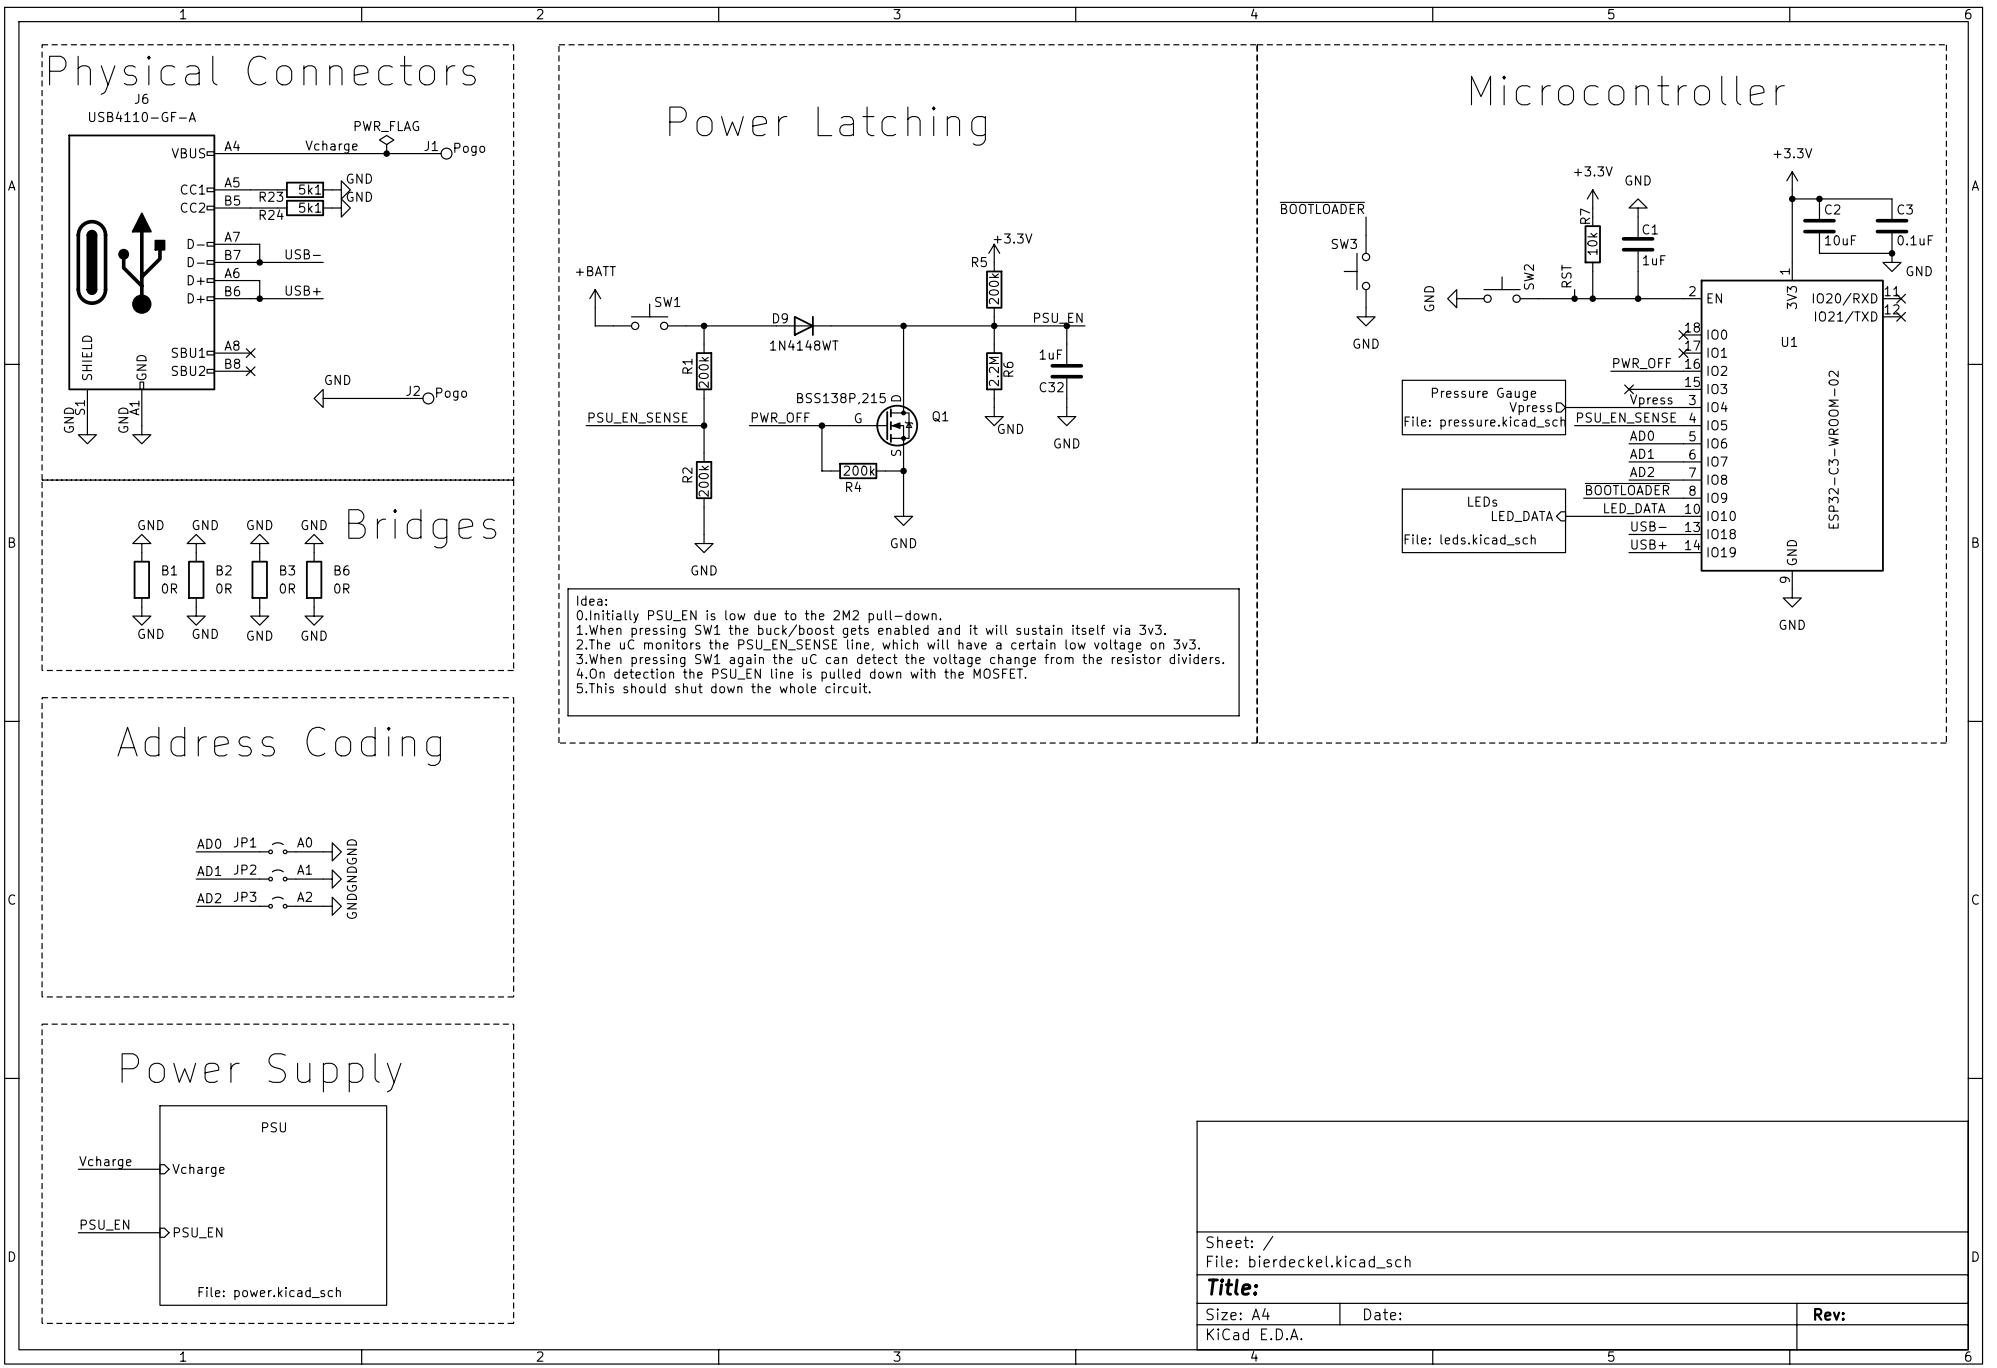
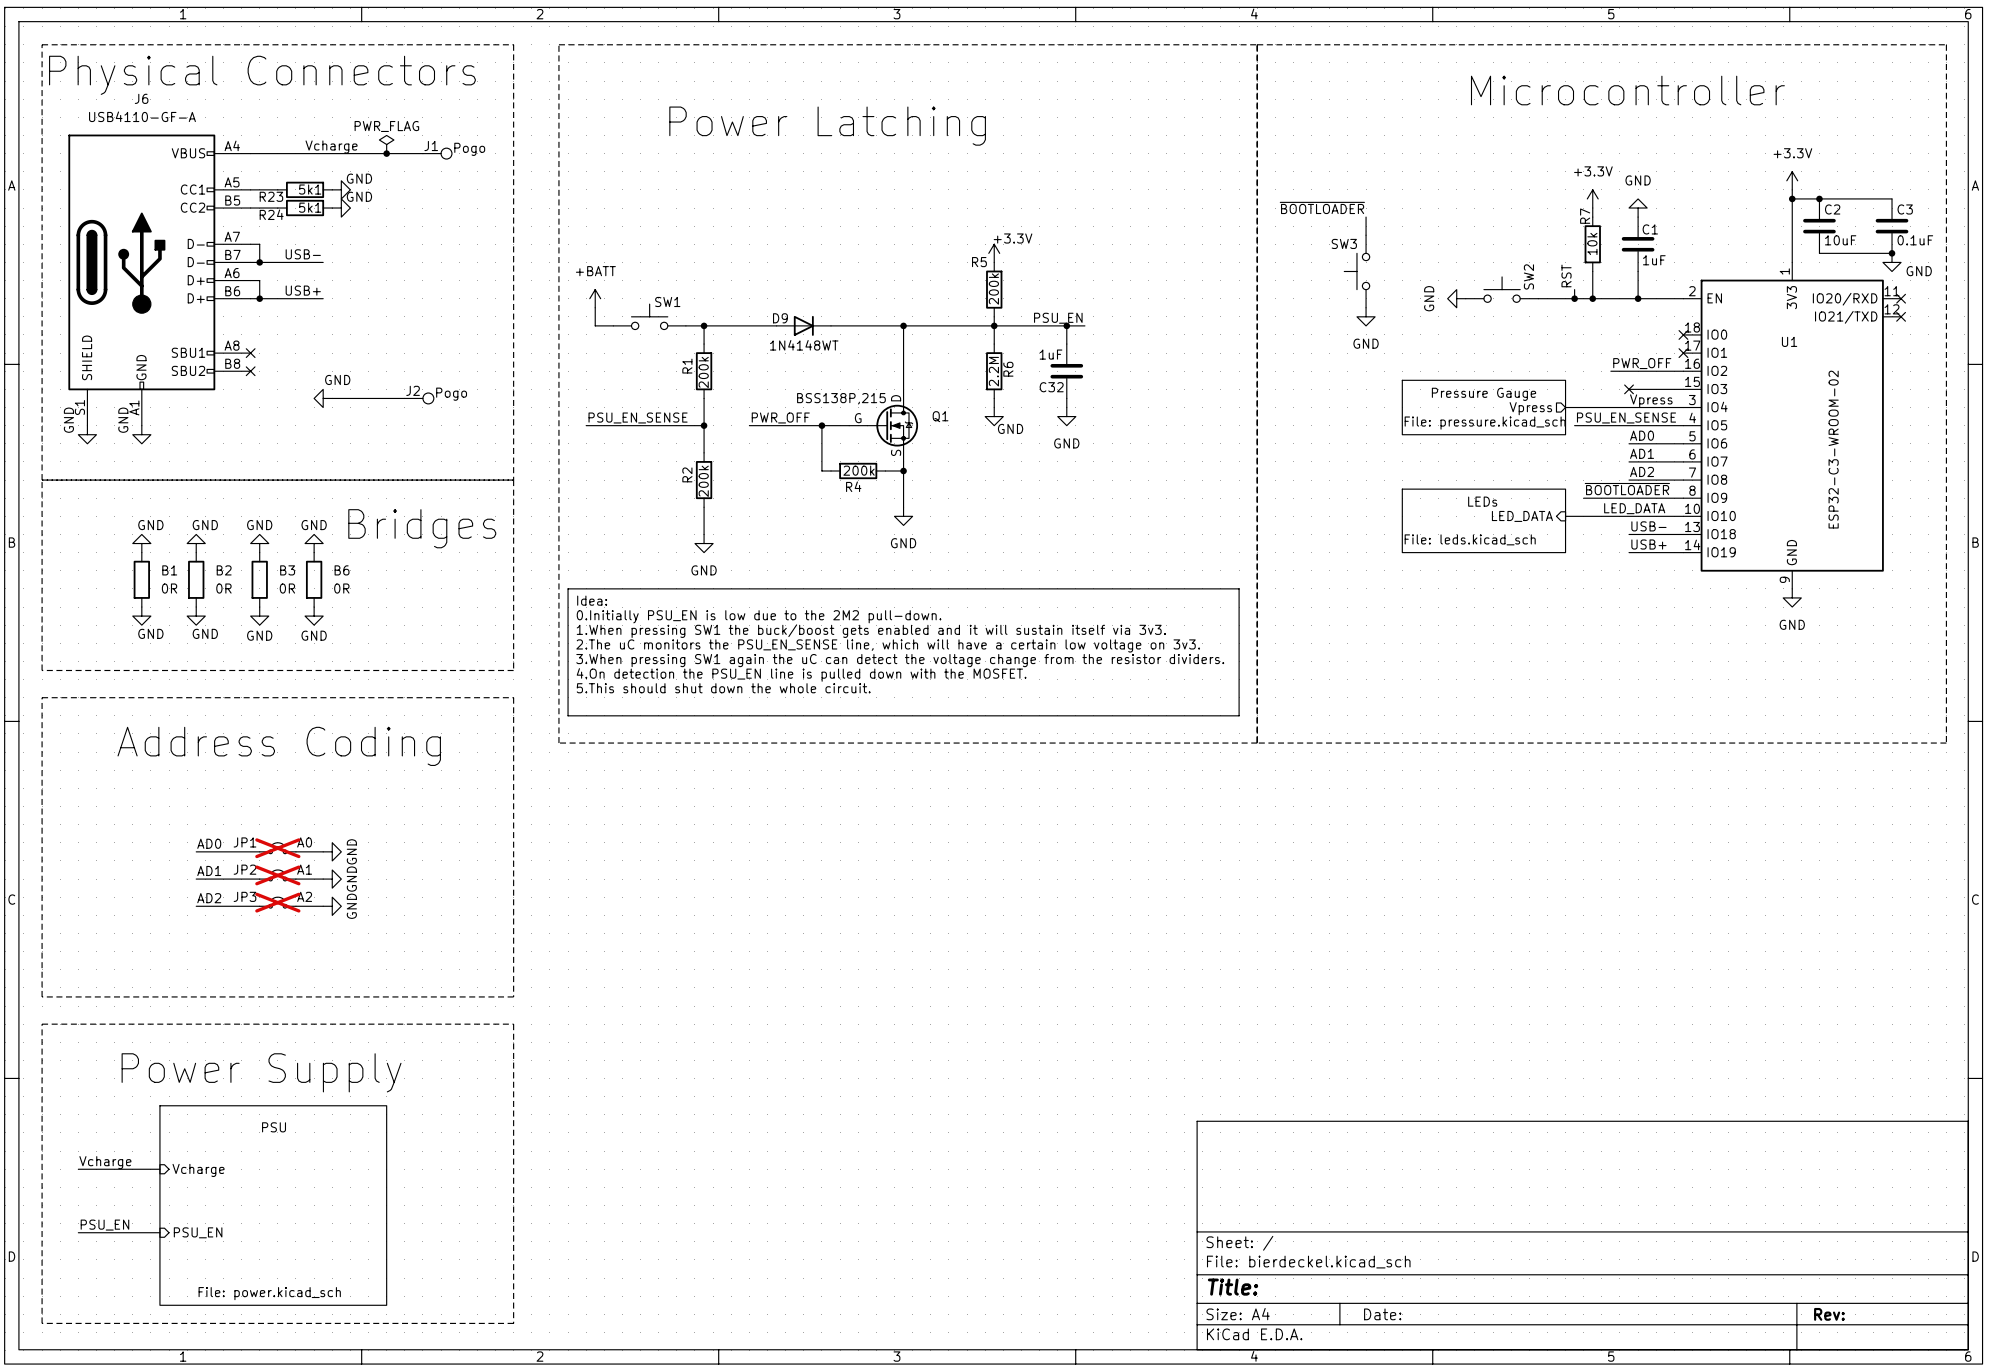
JP1 do-not-place cross: none -> (277, 848)
JP2 do-not-place cross: none -> (277, 875)
JP3 do-not-place cross: none -> (277, 902)

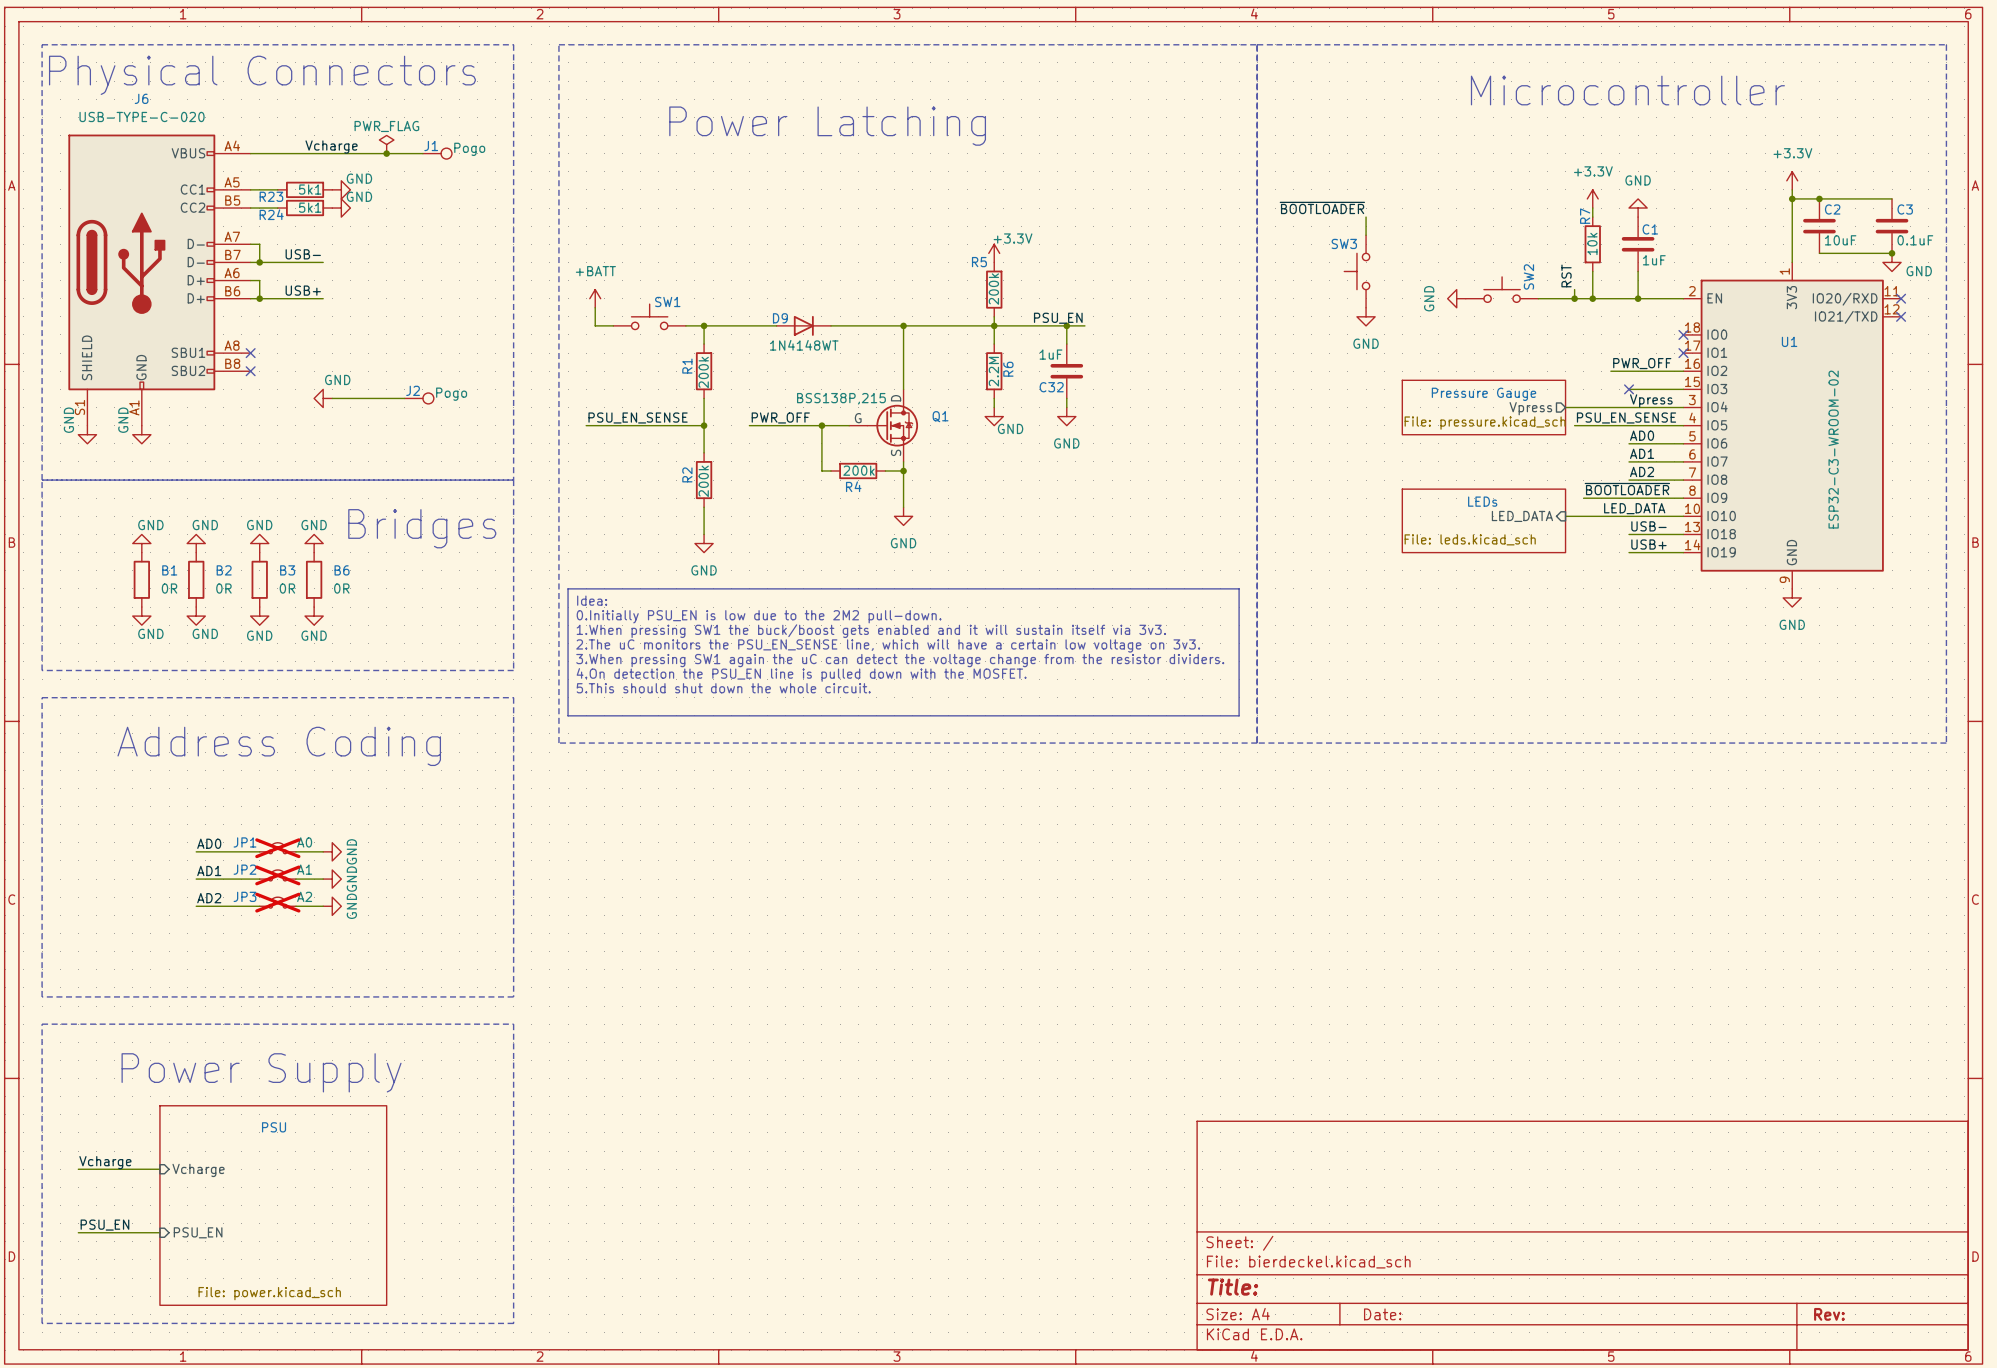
J6 value: USB4110-GF-A (142, 116) -> USB-TYPE-C-020 (142, 116)

